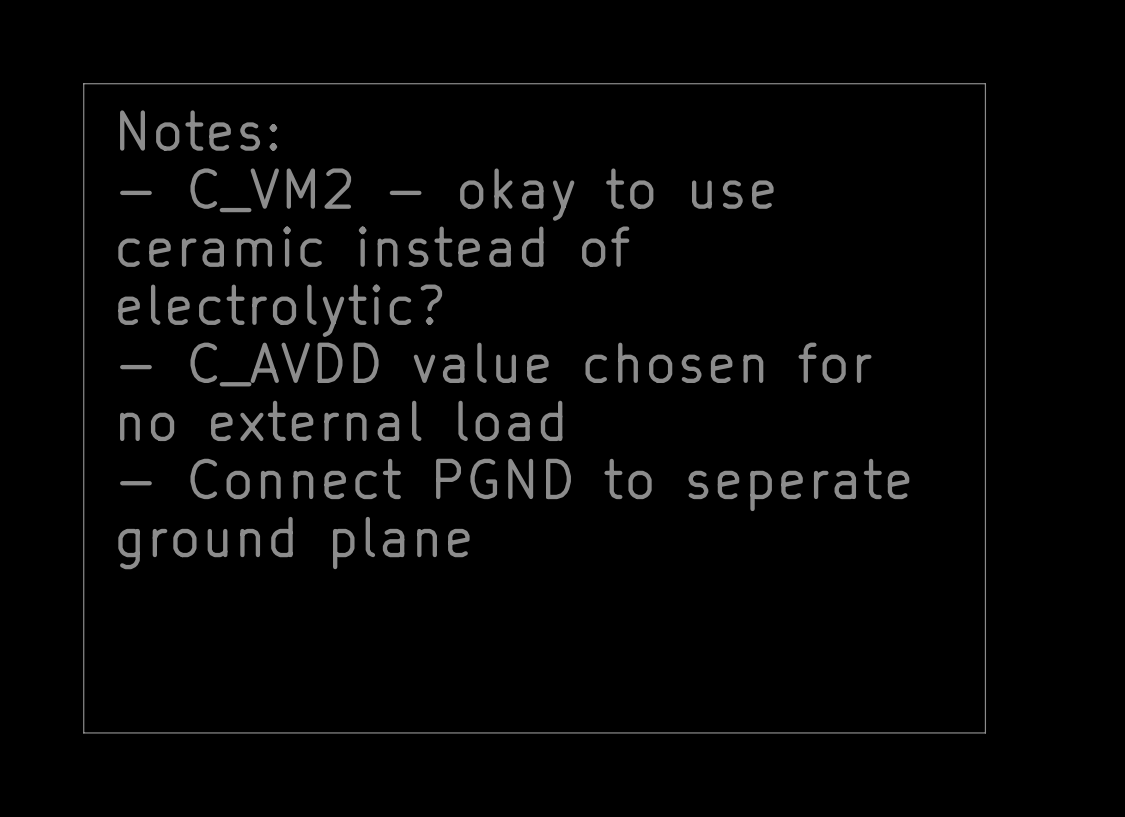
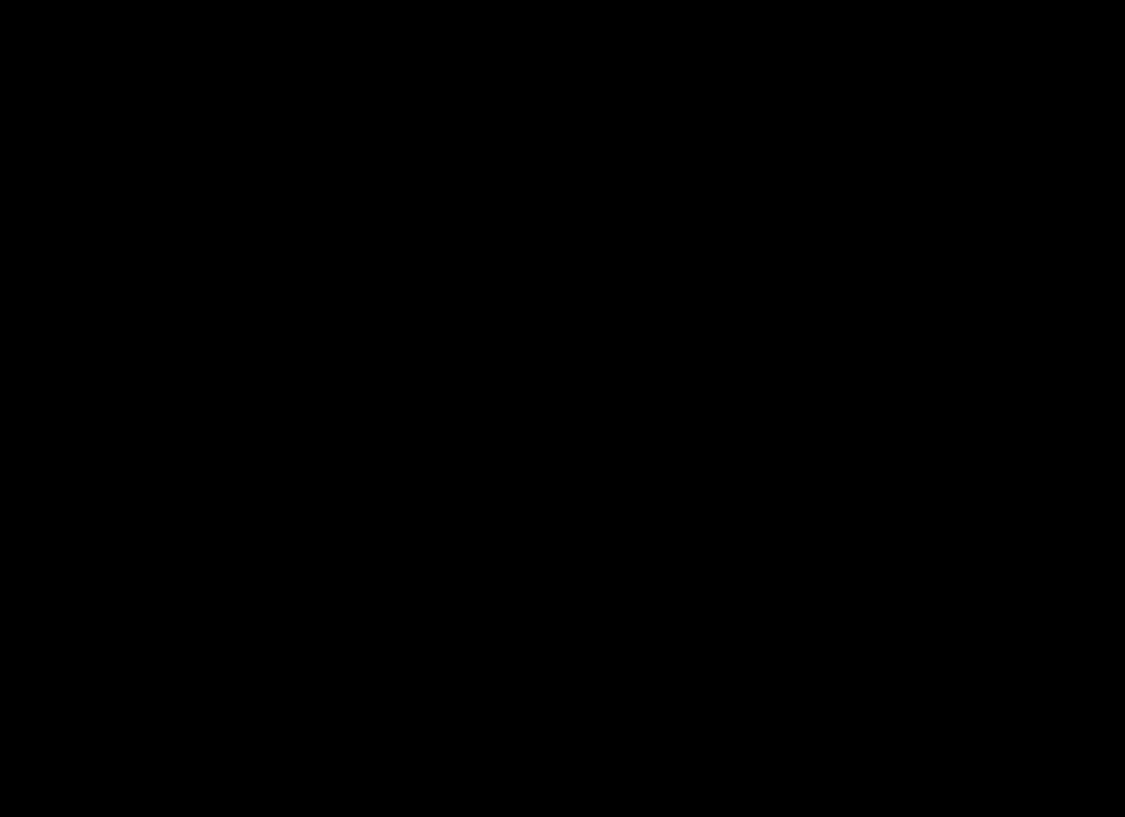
line: (83, 83) (985, 83) (985, 732) (83, 732) (83, 83) -> none
text: Notes: (198, 130) -> none
text: - C_VM2 - okay to use (446, 194) -> none
text: ceramic instead of (373, 246) -> none
text: electrolytic? (280, 310) -> none
text: - C_AVDD value chosen for (495, 364) -> none
text: no external load (341, 420) -> none
text: - Connect PGND to seperate (514, 484) -> none
text: ground plane (293, 543) -> none

